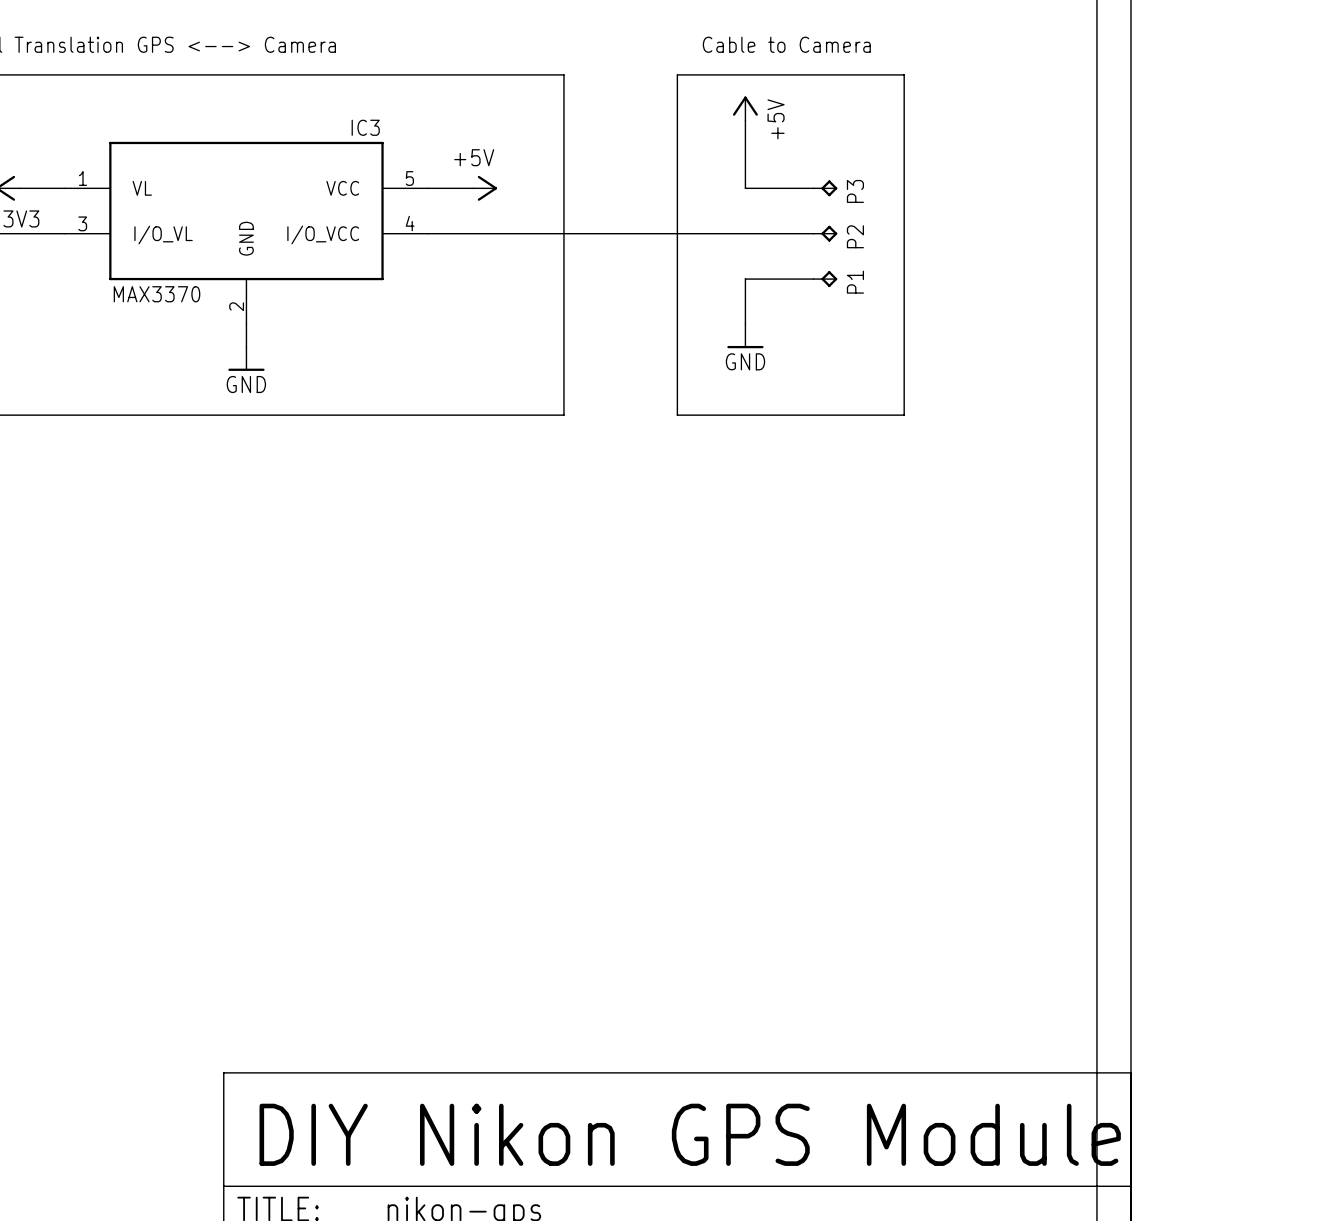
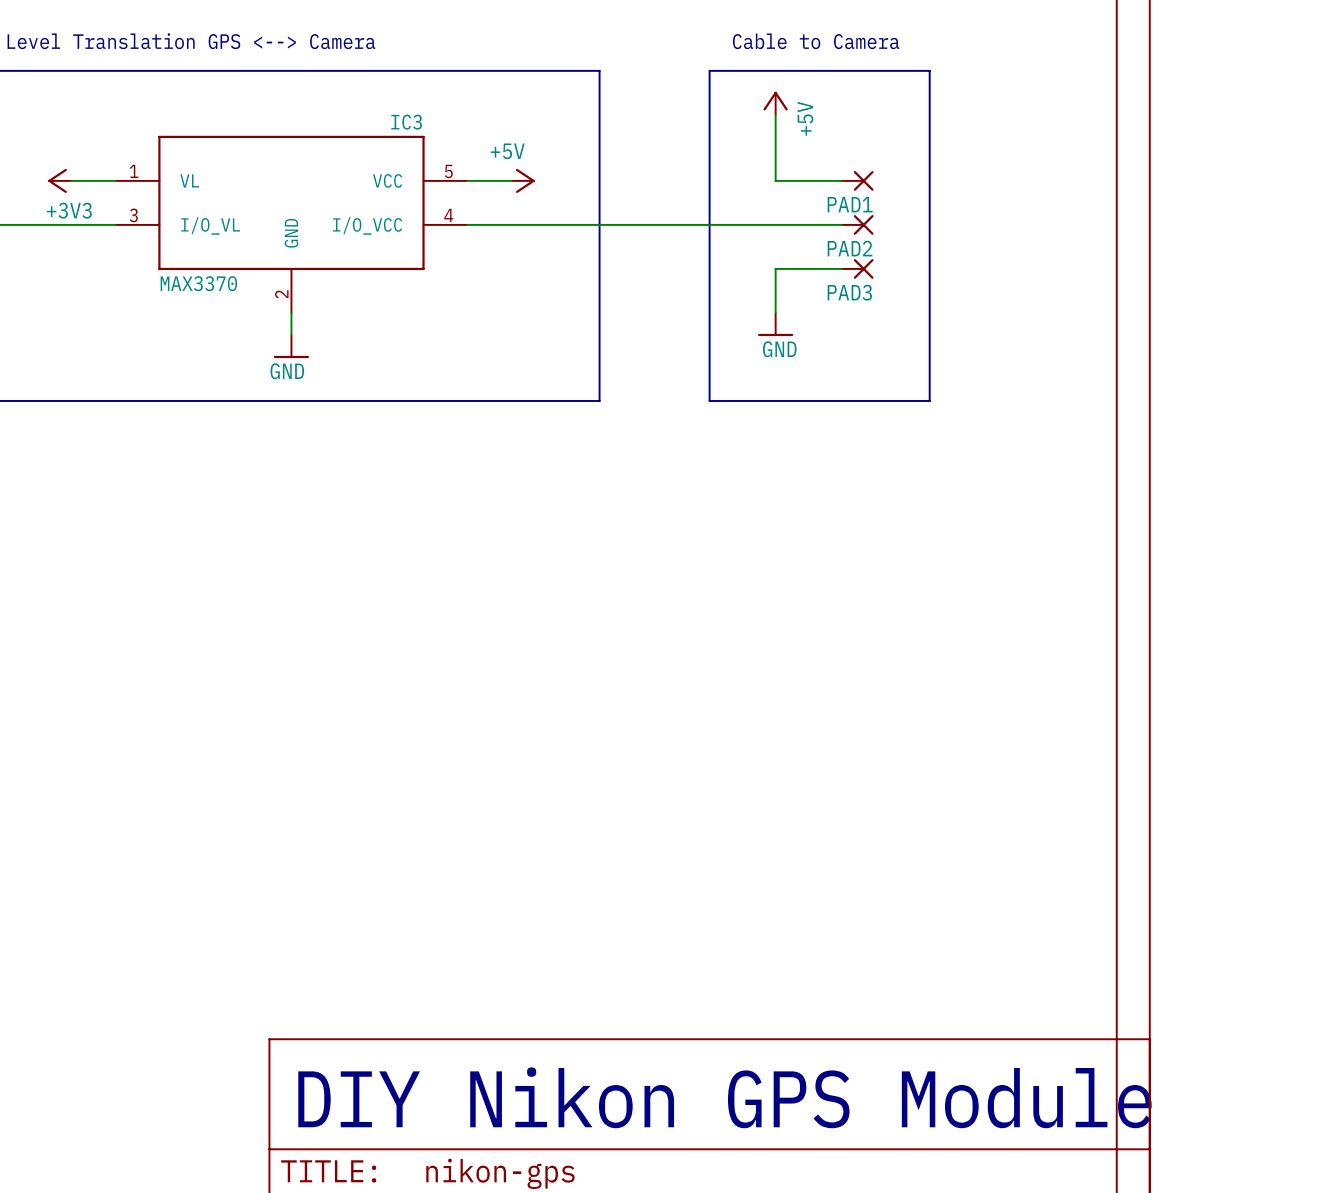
P3: (825, 188) -> none
PAD1: none -> (857, 180)
P2: (825, 233) -> none
PAD2: none -> (857, 224)
P1: (825, 279) -> none
PAD3: none -> (857, 268)

